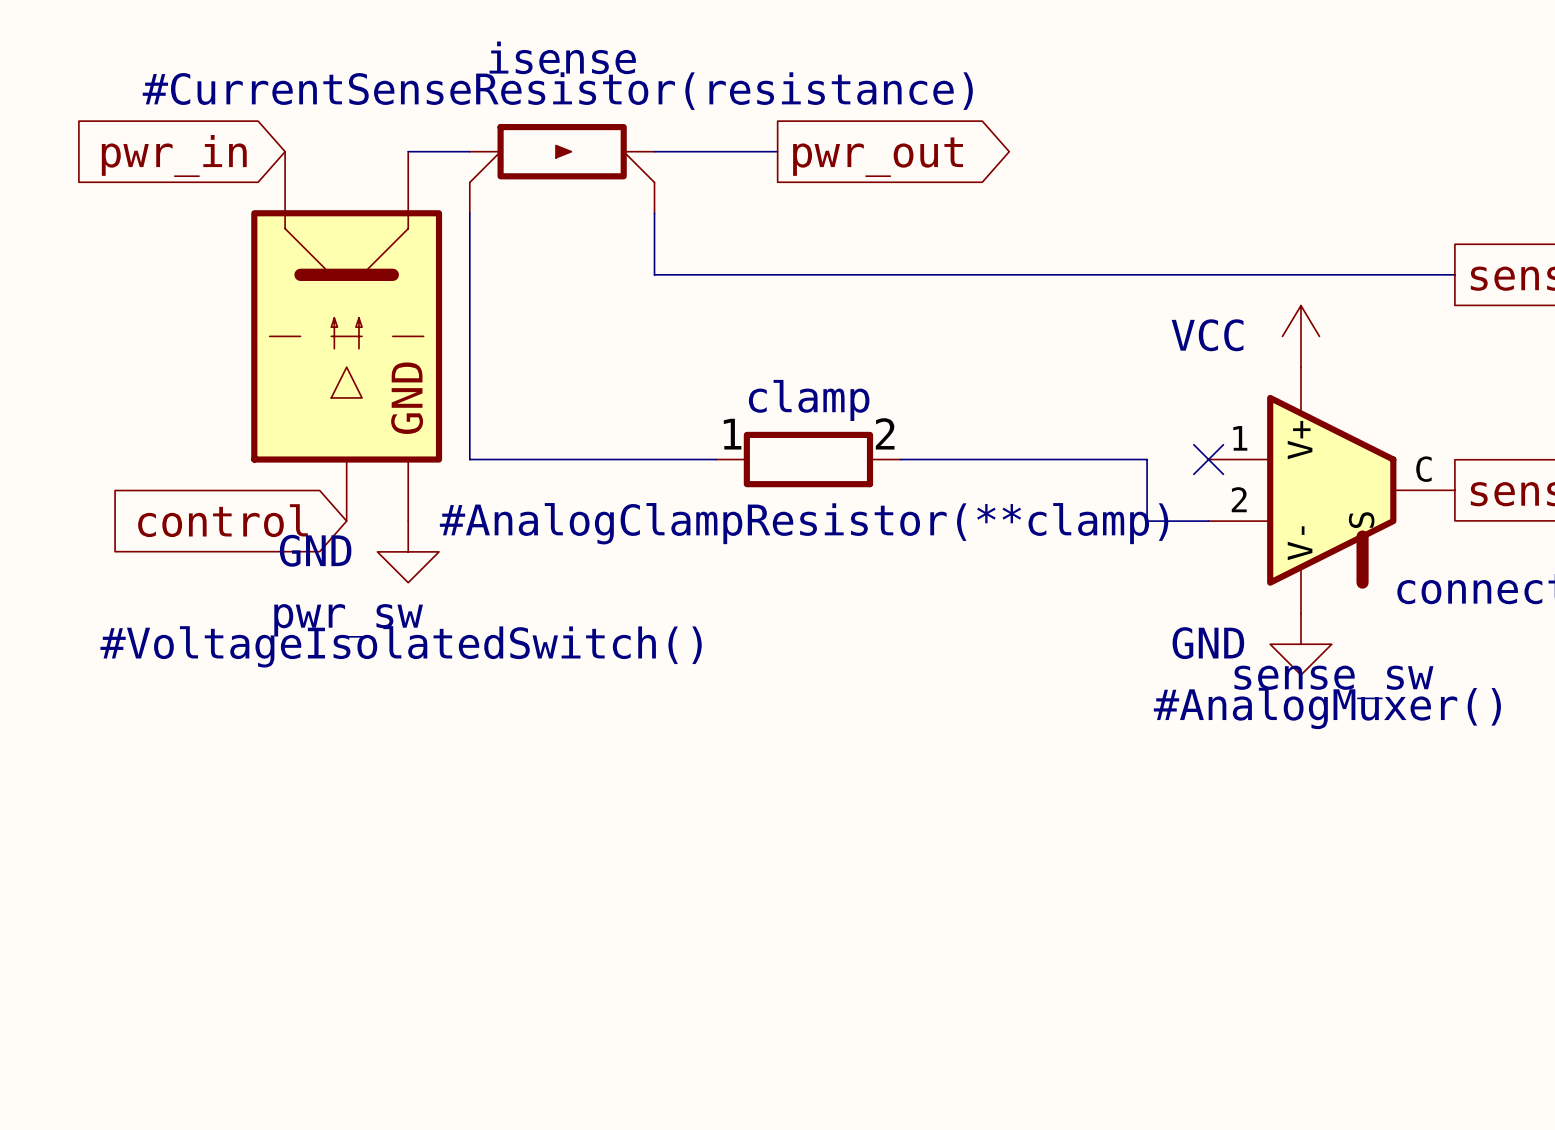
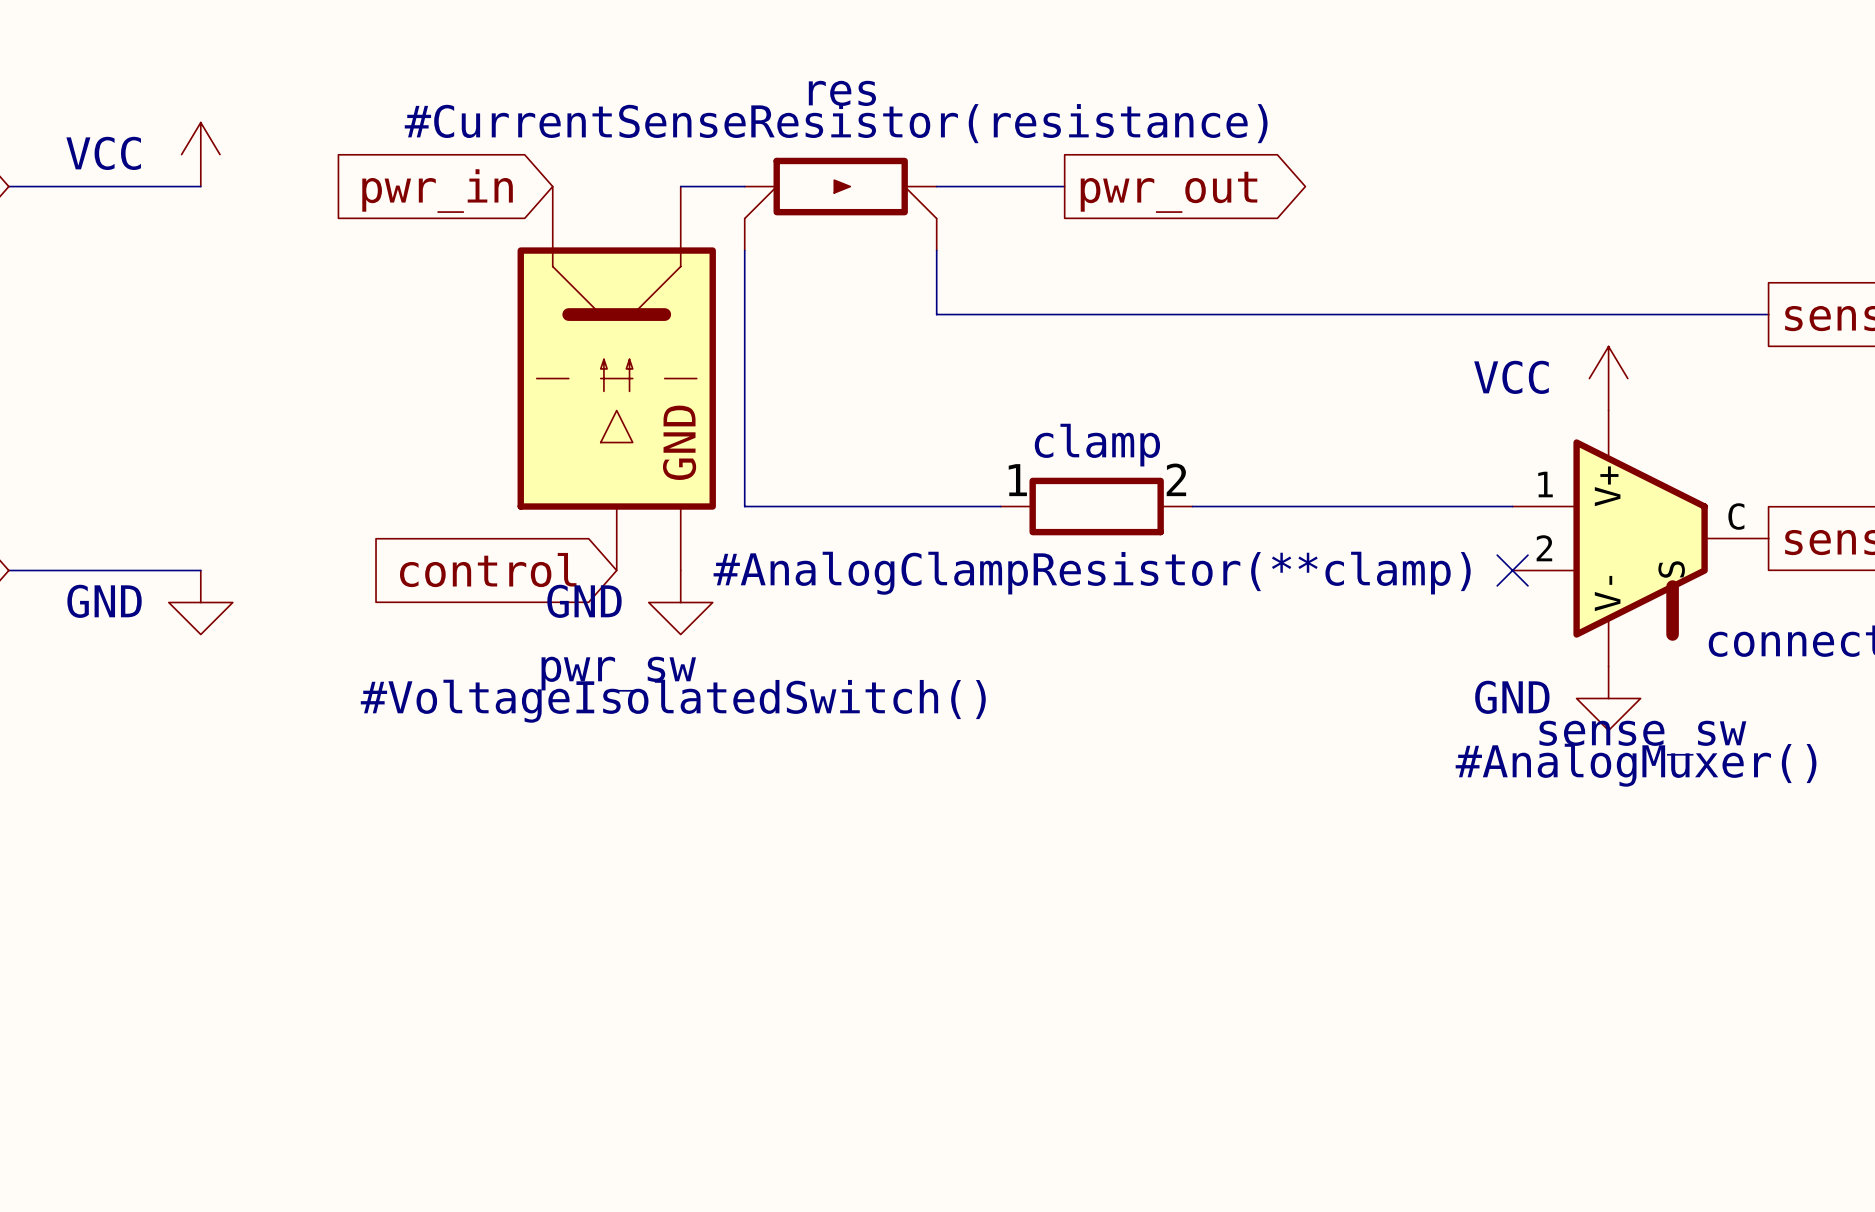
isense name: isense (562, 57) -> res (842, 93)
wire: (1147, 459) (1147, 521) (1208, 521) -> (1448, 506) (1512, 506)
no-connect mark position: (1208, 459) -> (1512, 570)

